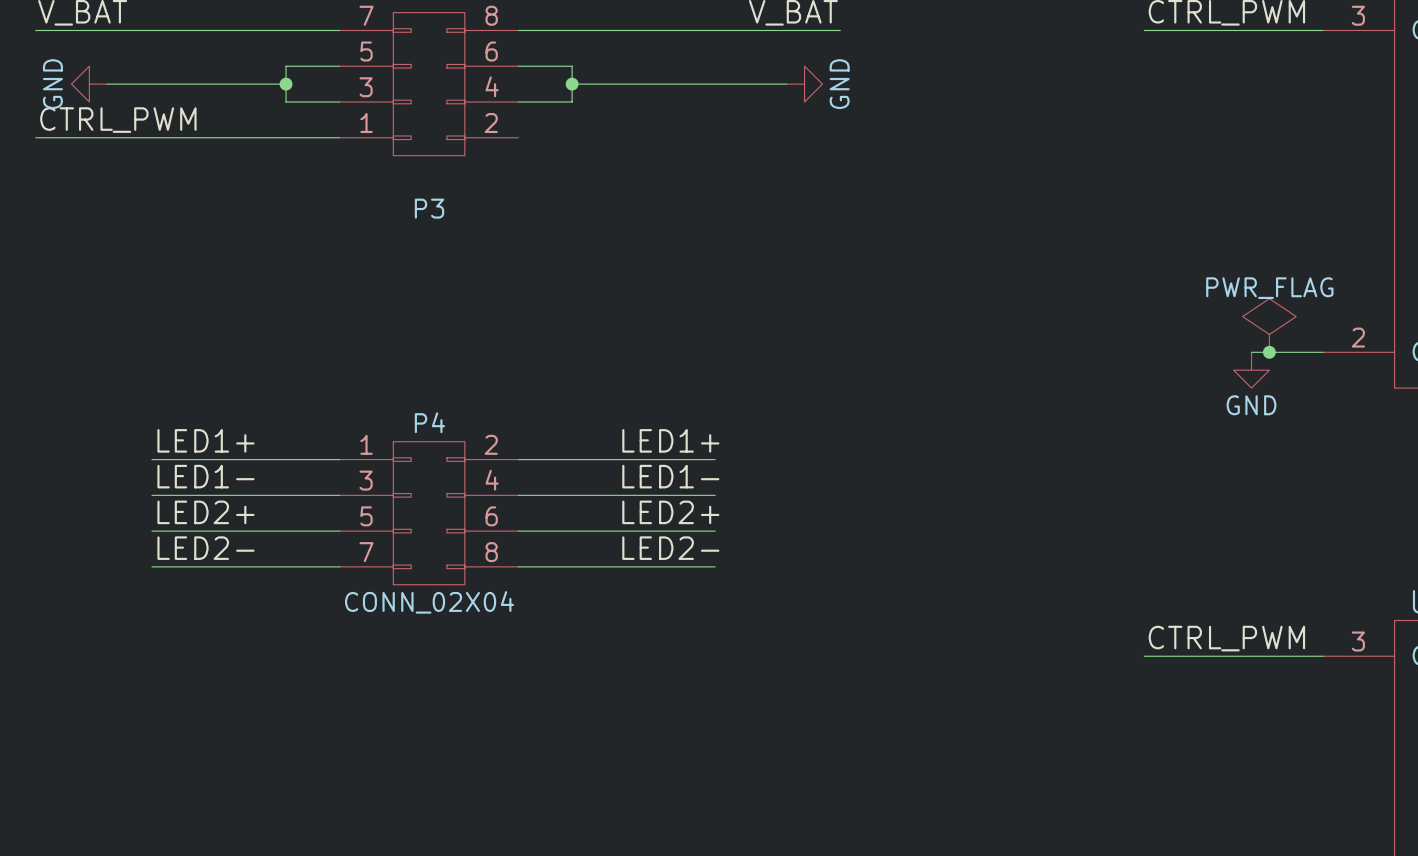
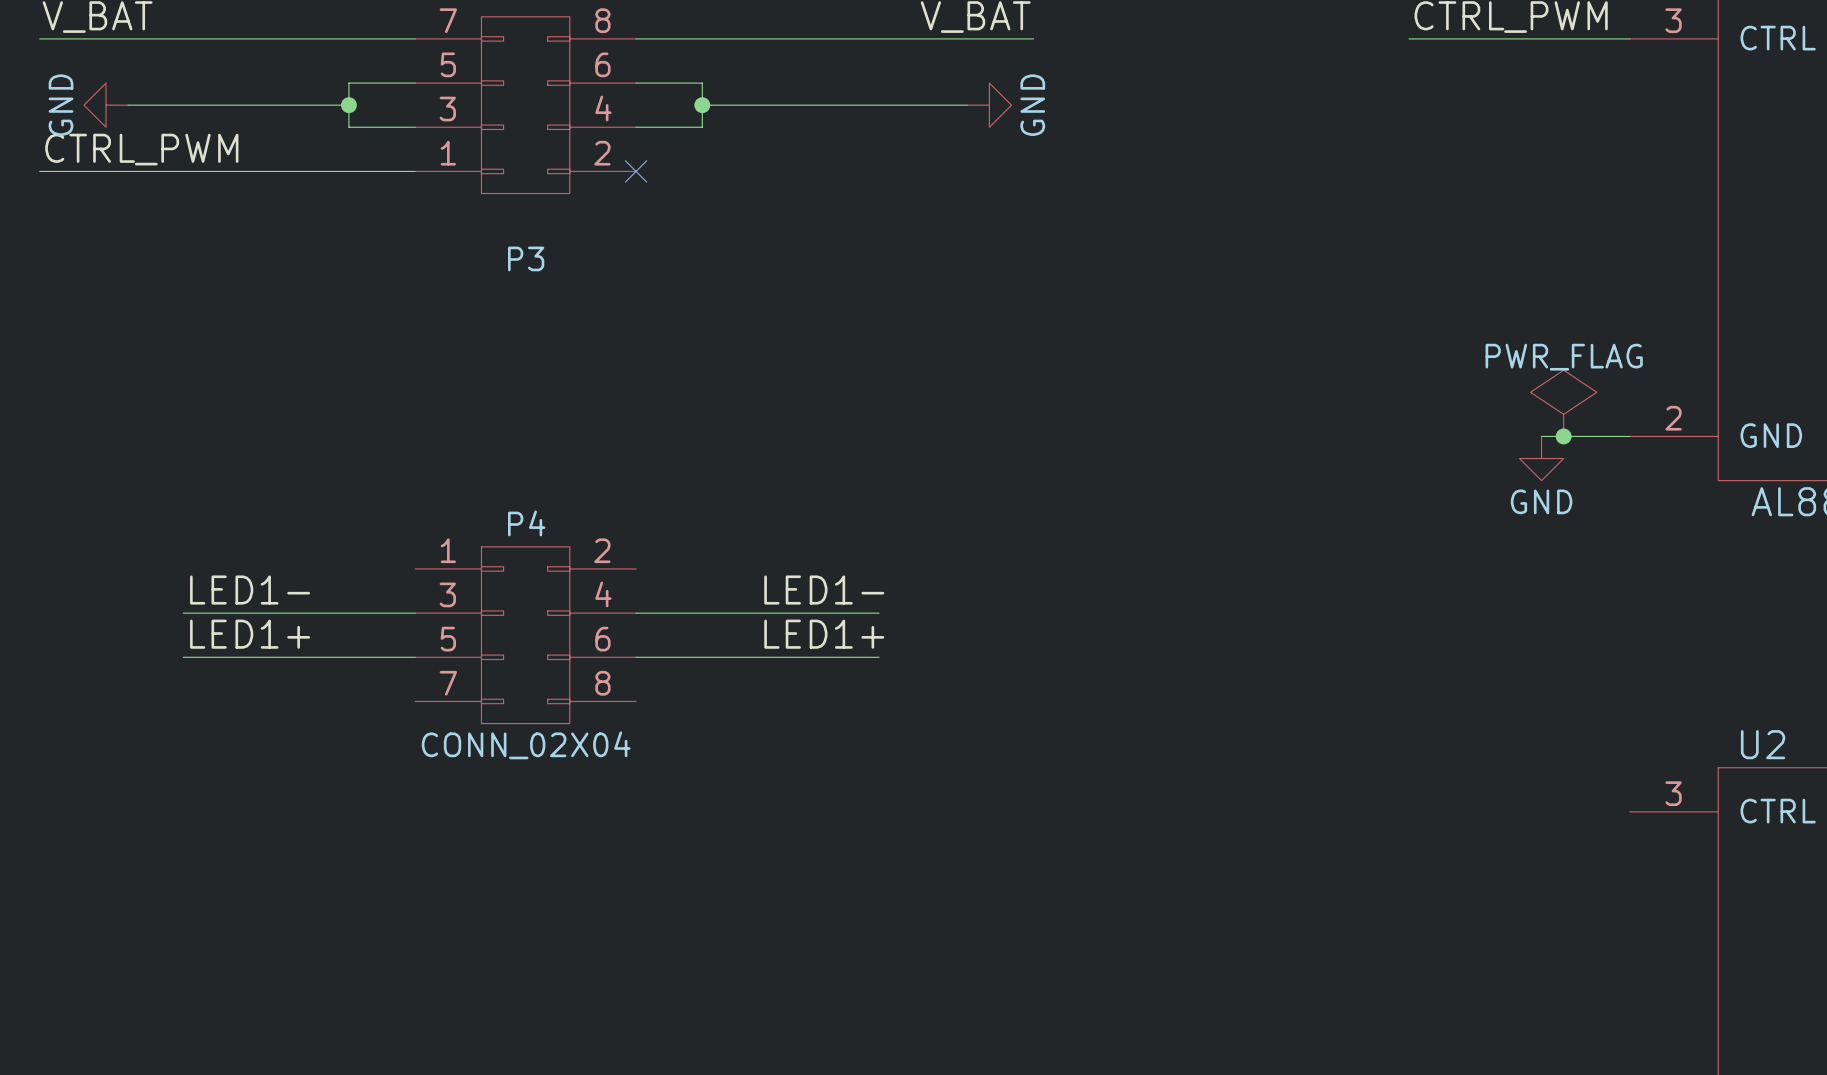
no-connect mark: none -> (636, 171)
label: LED1+ (205, 440) -> none
label: LED1+ (670, 440) -> none
wire: (151, 459) (339, 459) -> none
wire: (518, 459) (715, 459) -> none
label: LED2+ (205, 512) -> LED1+ (250, 634)
label: LED2+ (670, 512) -> LED1+ (824, 634)
label: LED2- (205, 548) -> none
label: LED2- (670, 548) -> none
wire: (151, 566) (339, 566) -> none
wire: (518, 566) (715, 566) -> none
label: CTRL_PWM (1226, 638) -> none
wire: (1144, 656) (1323, 656) -> none

